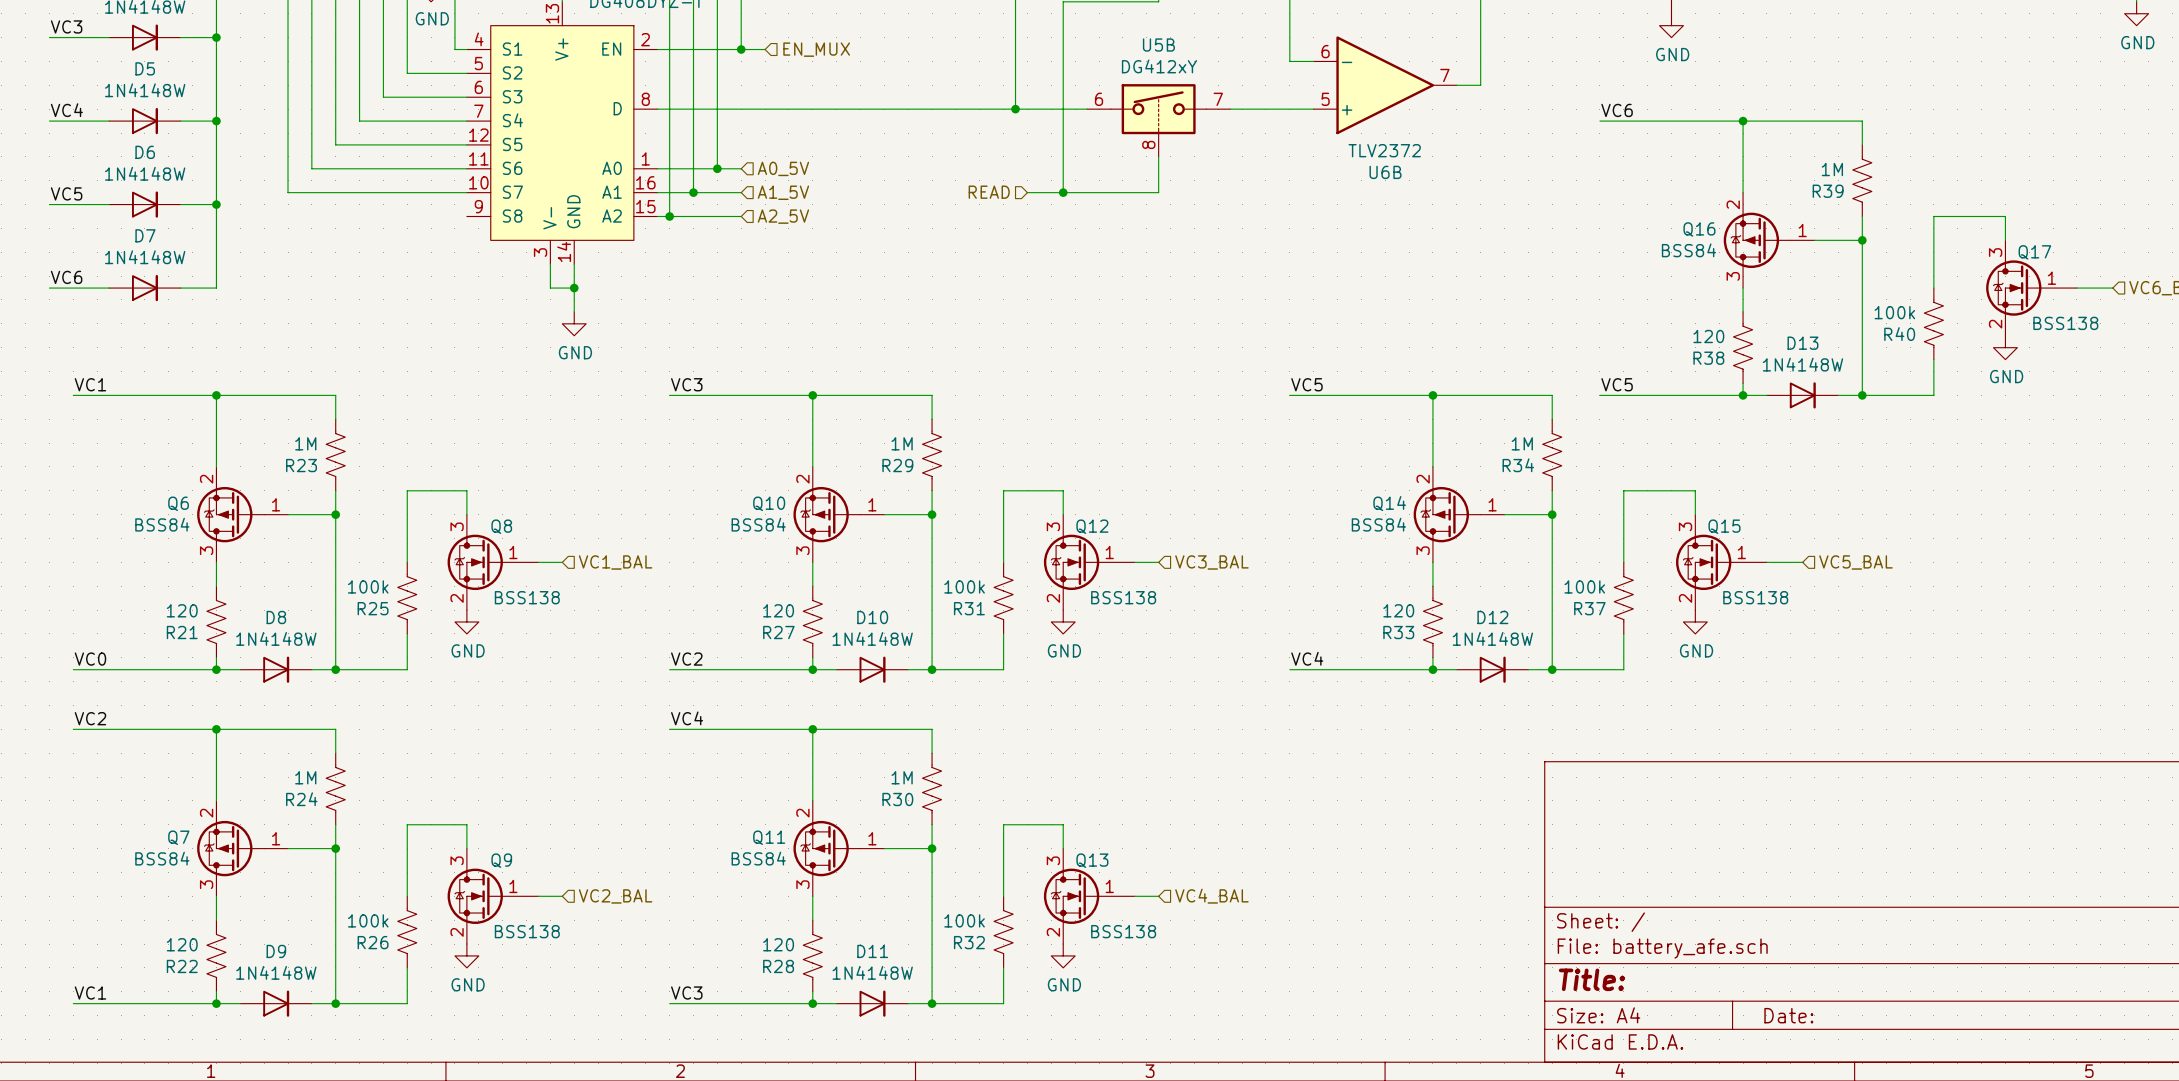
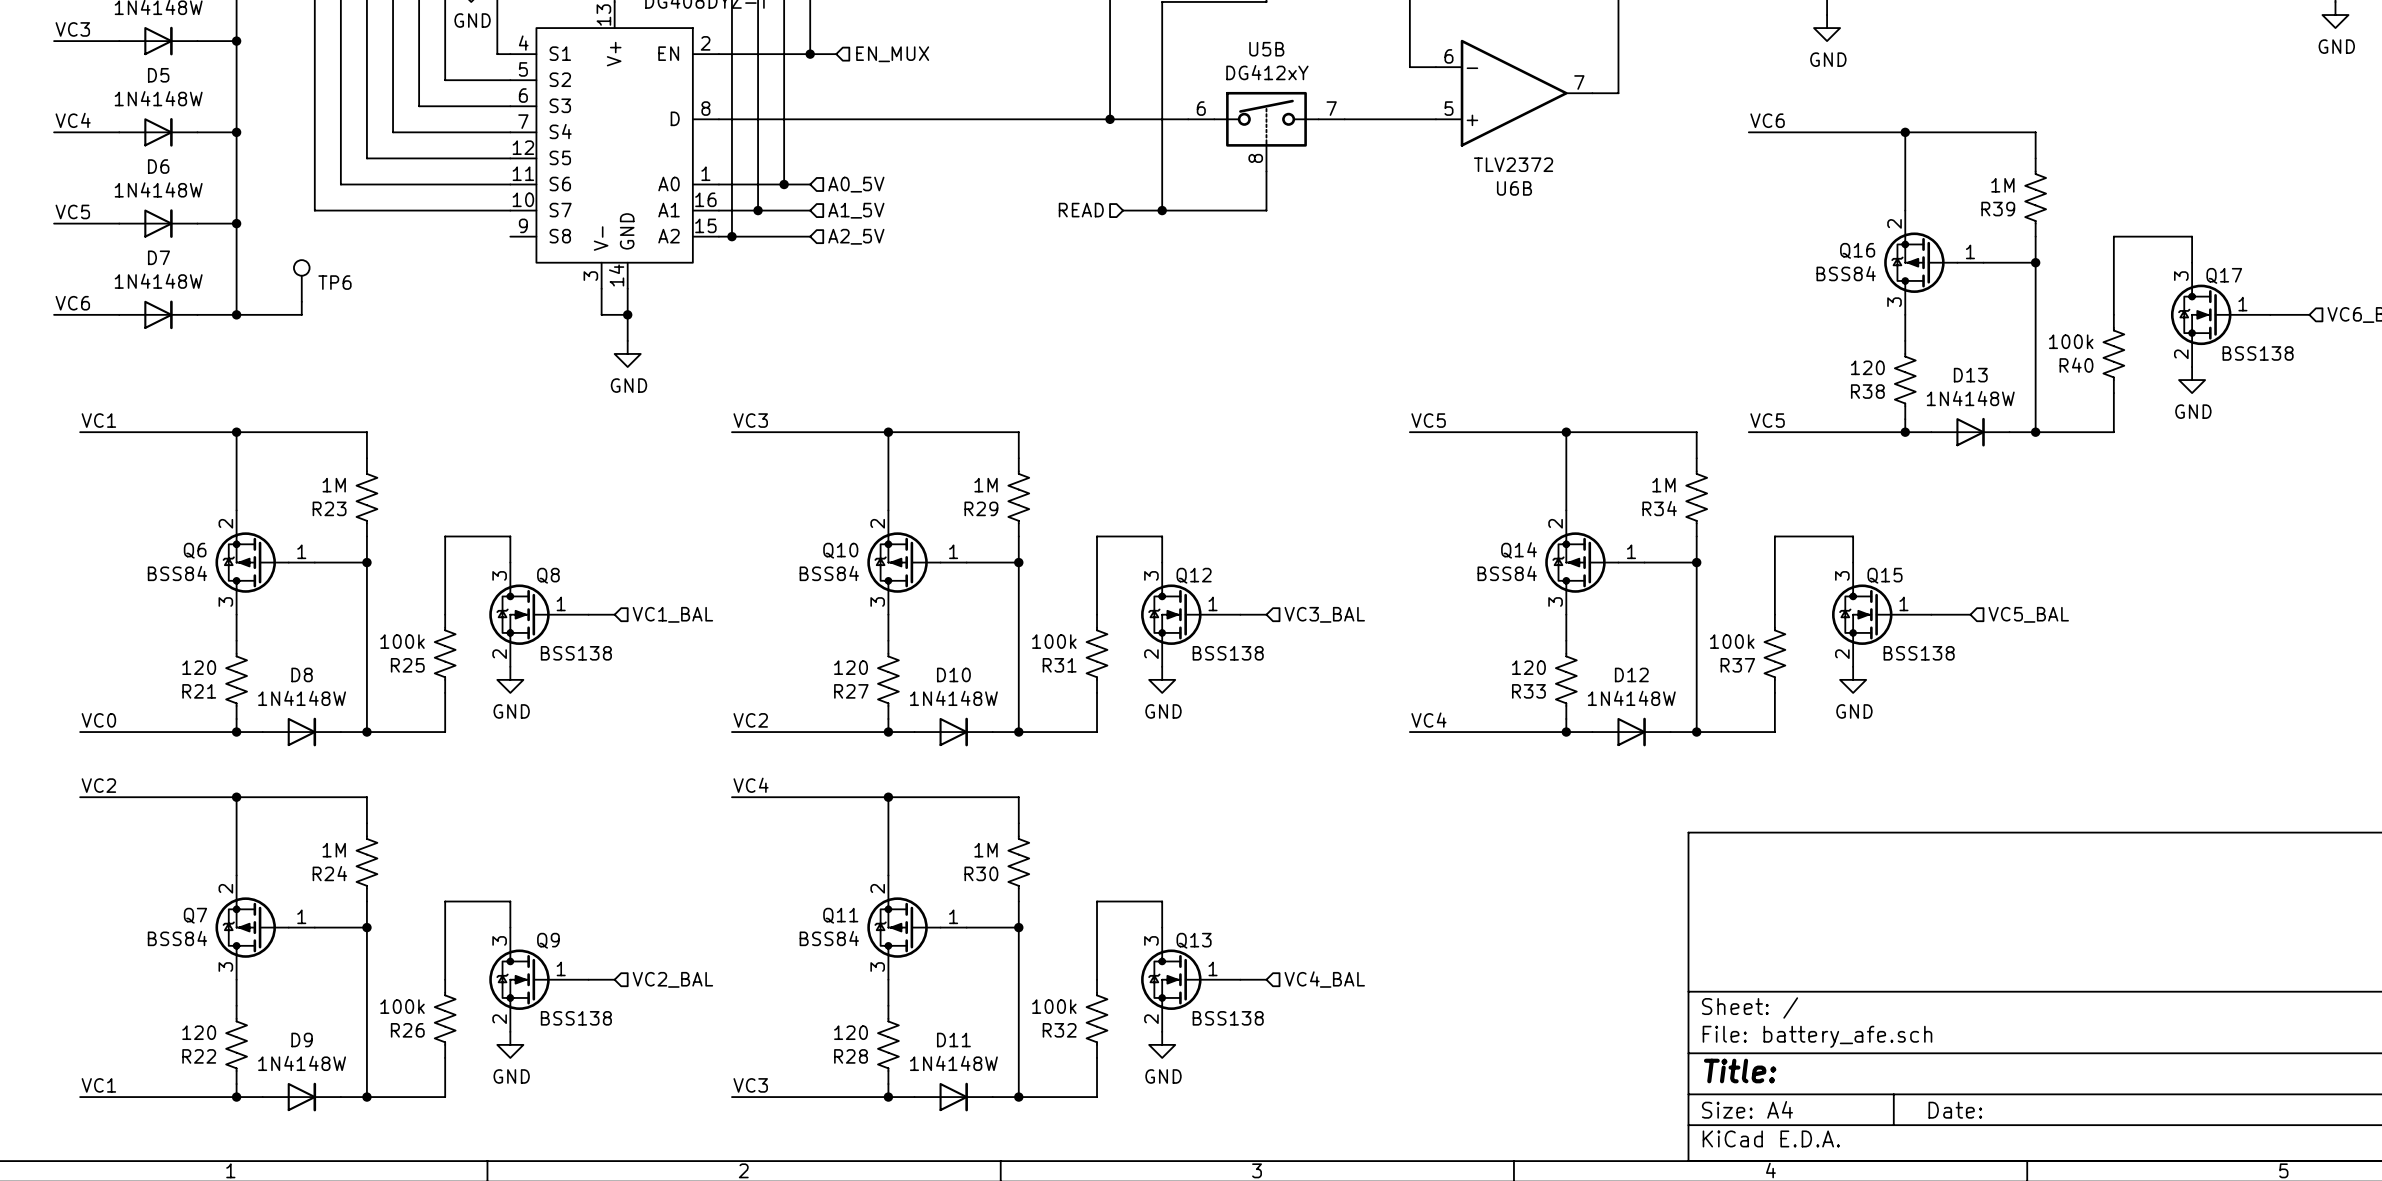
TP6: none -> (301, 280)
wire: none -> (301, 301) (301, 314) (236, 314)
junction: none -> (236, 314)

